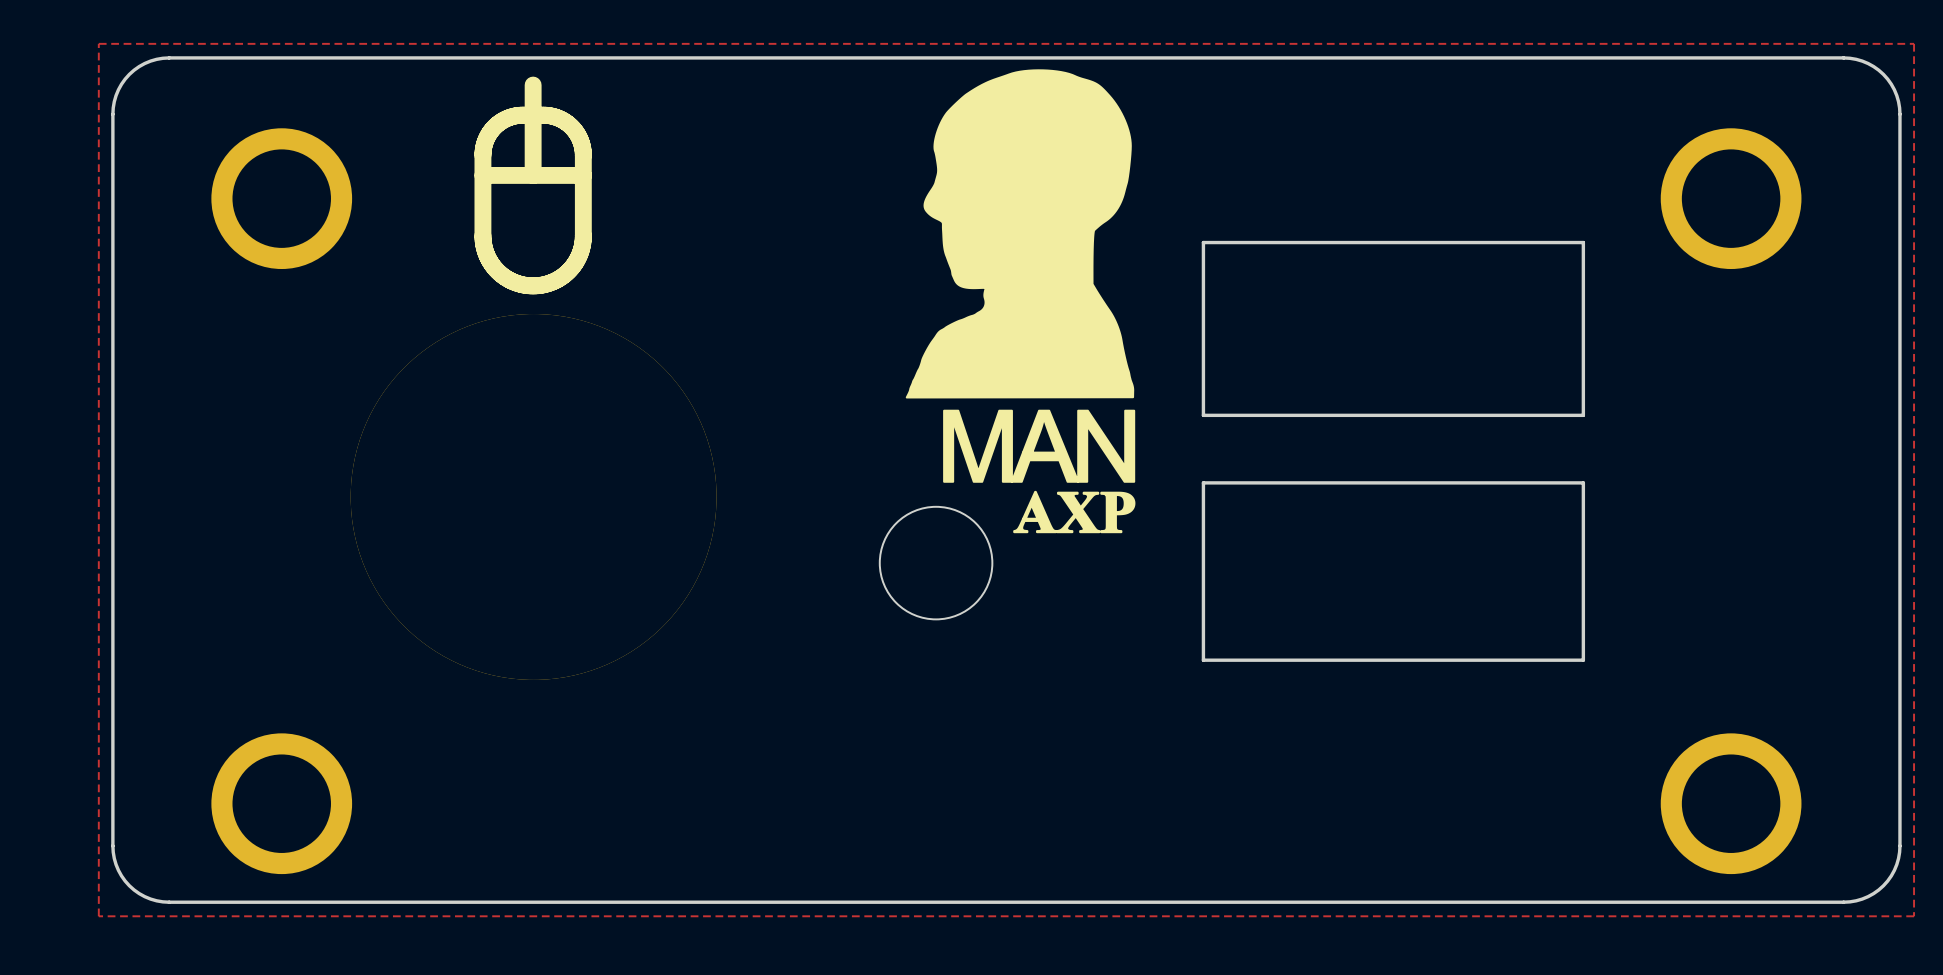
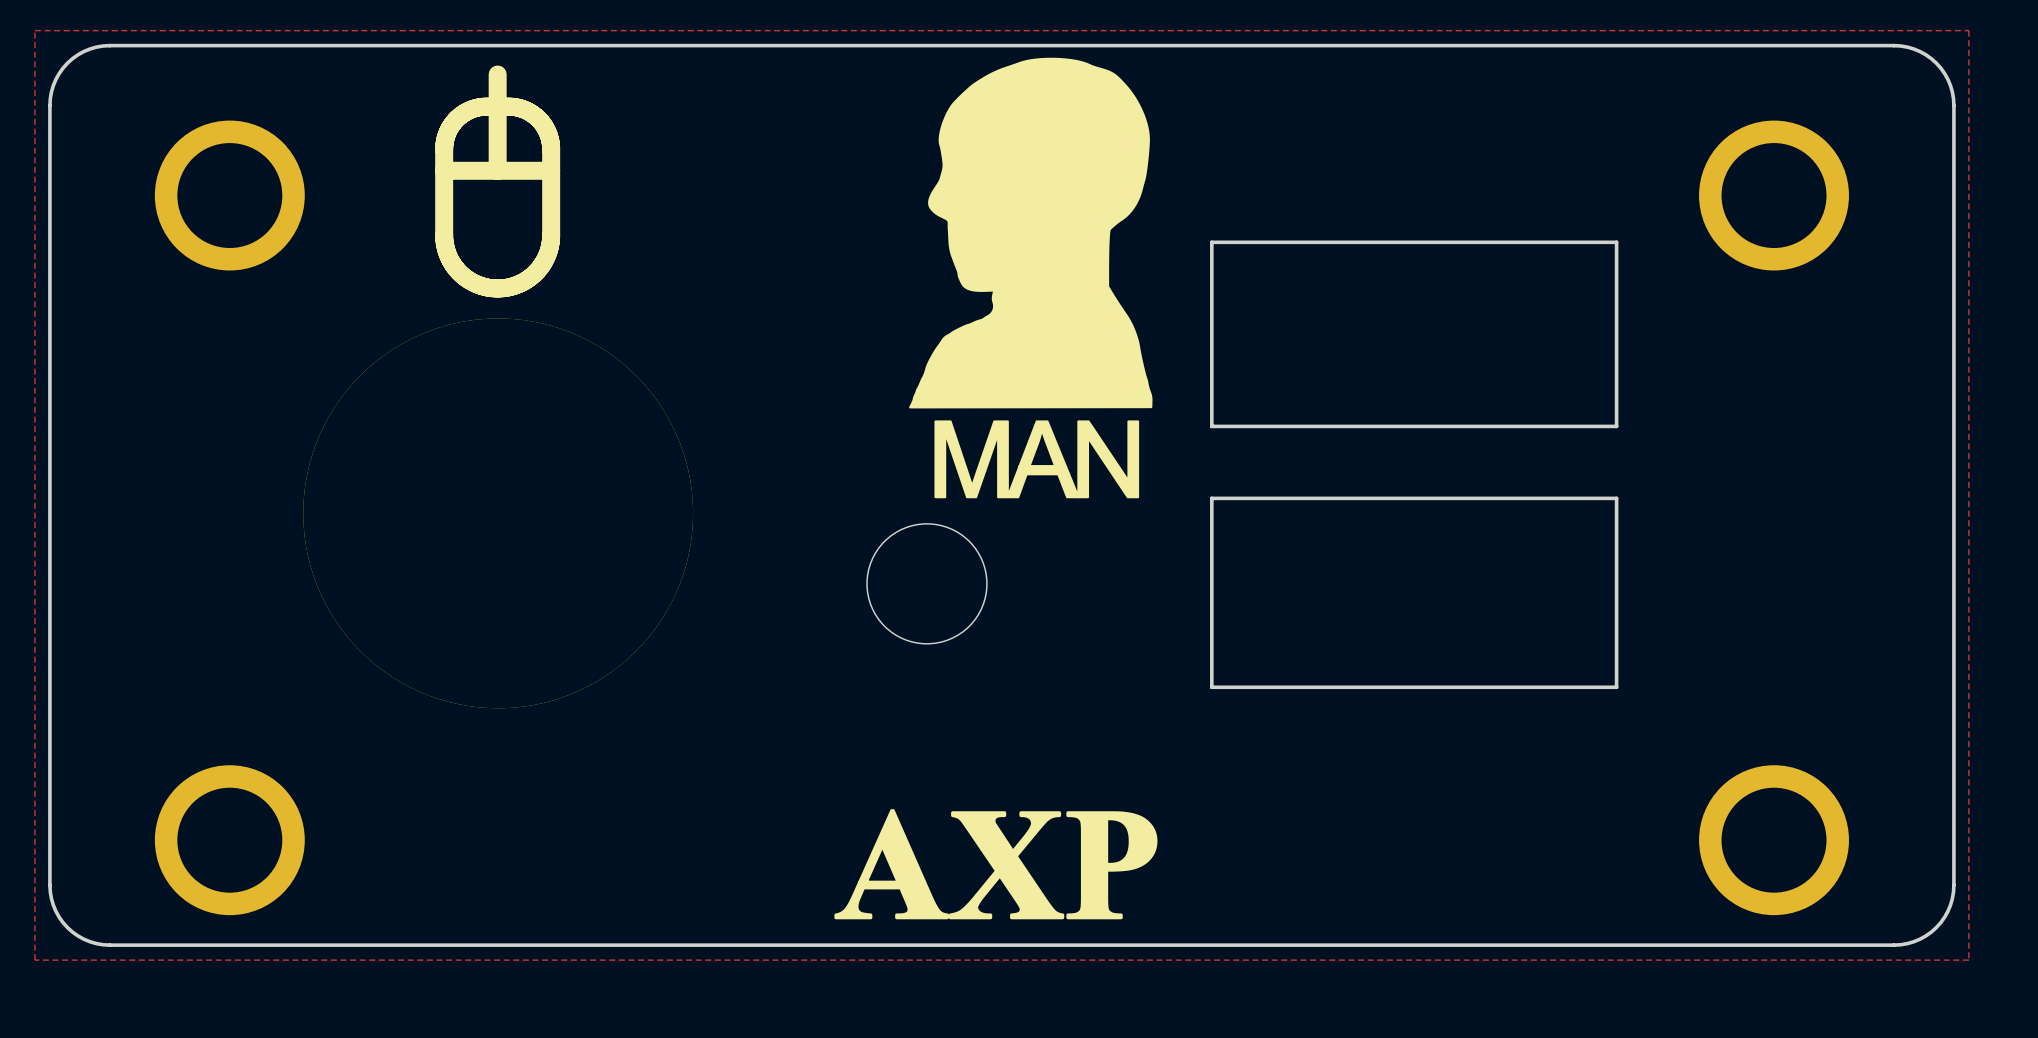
drawing position: (1019, 233) -> (1030, 233)
drawing: [1013, 490, 1136, 534] -> none
drawing: none -> [834, 809, 1158, 920]

